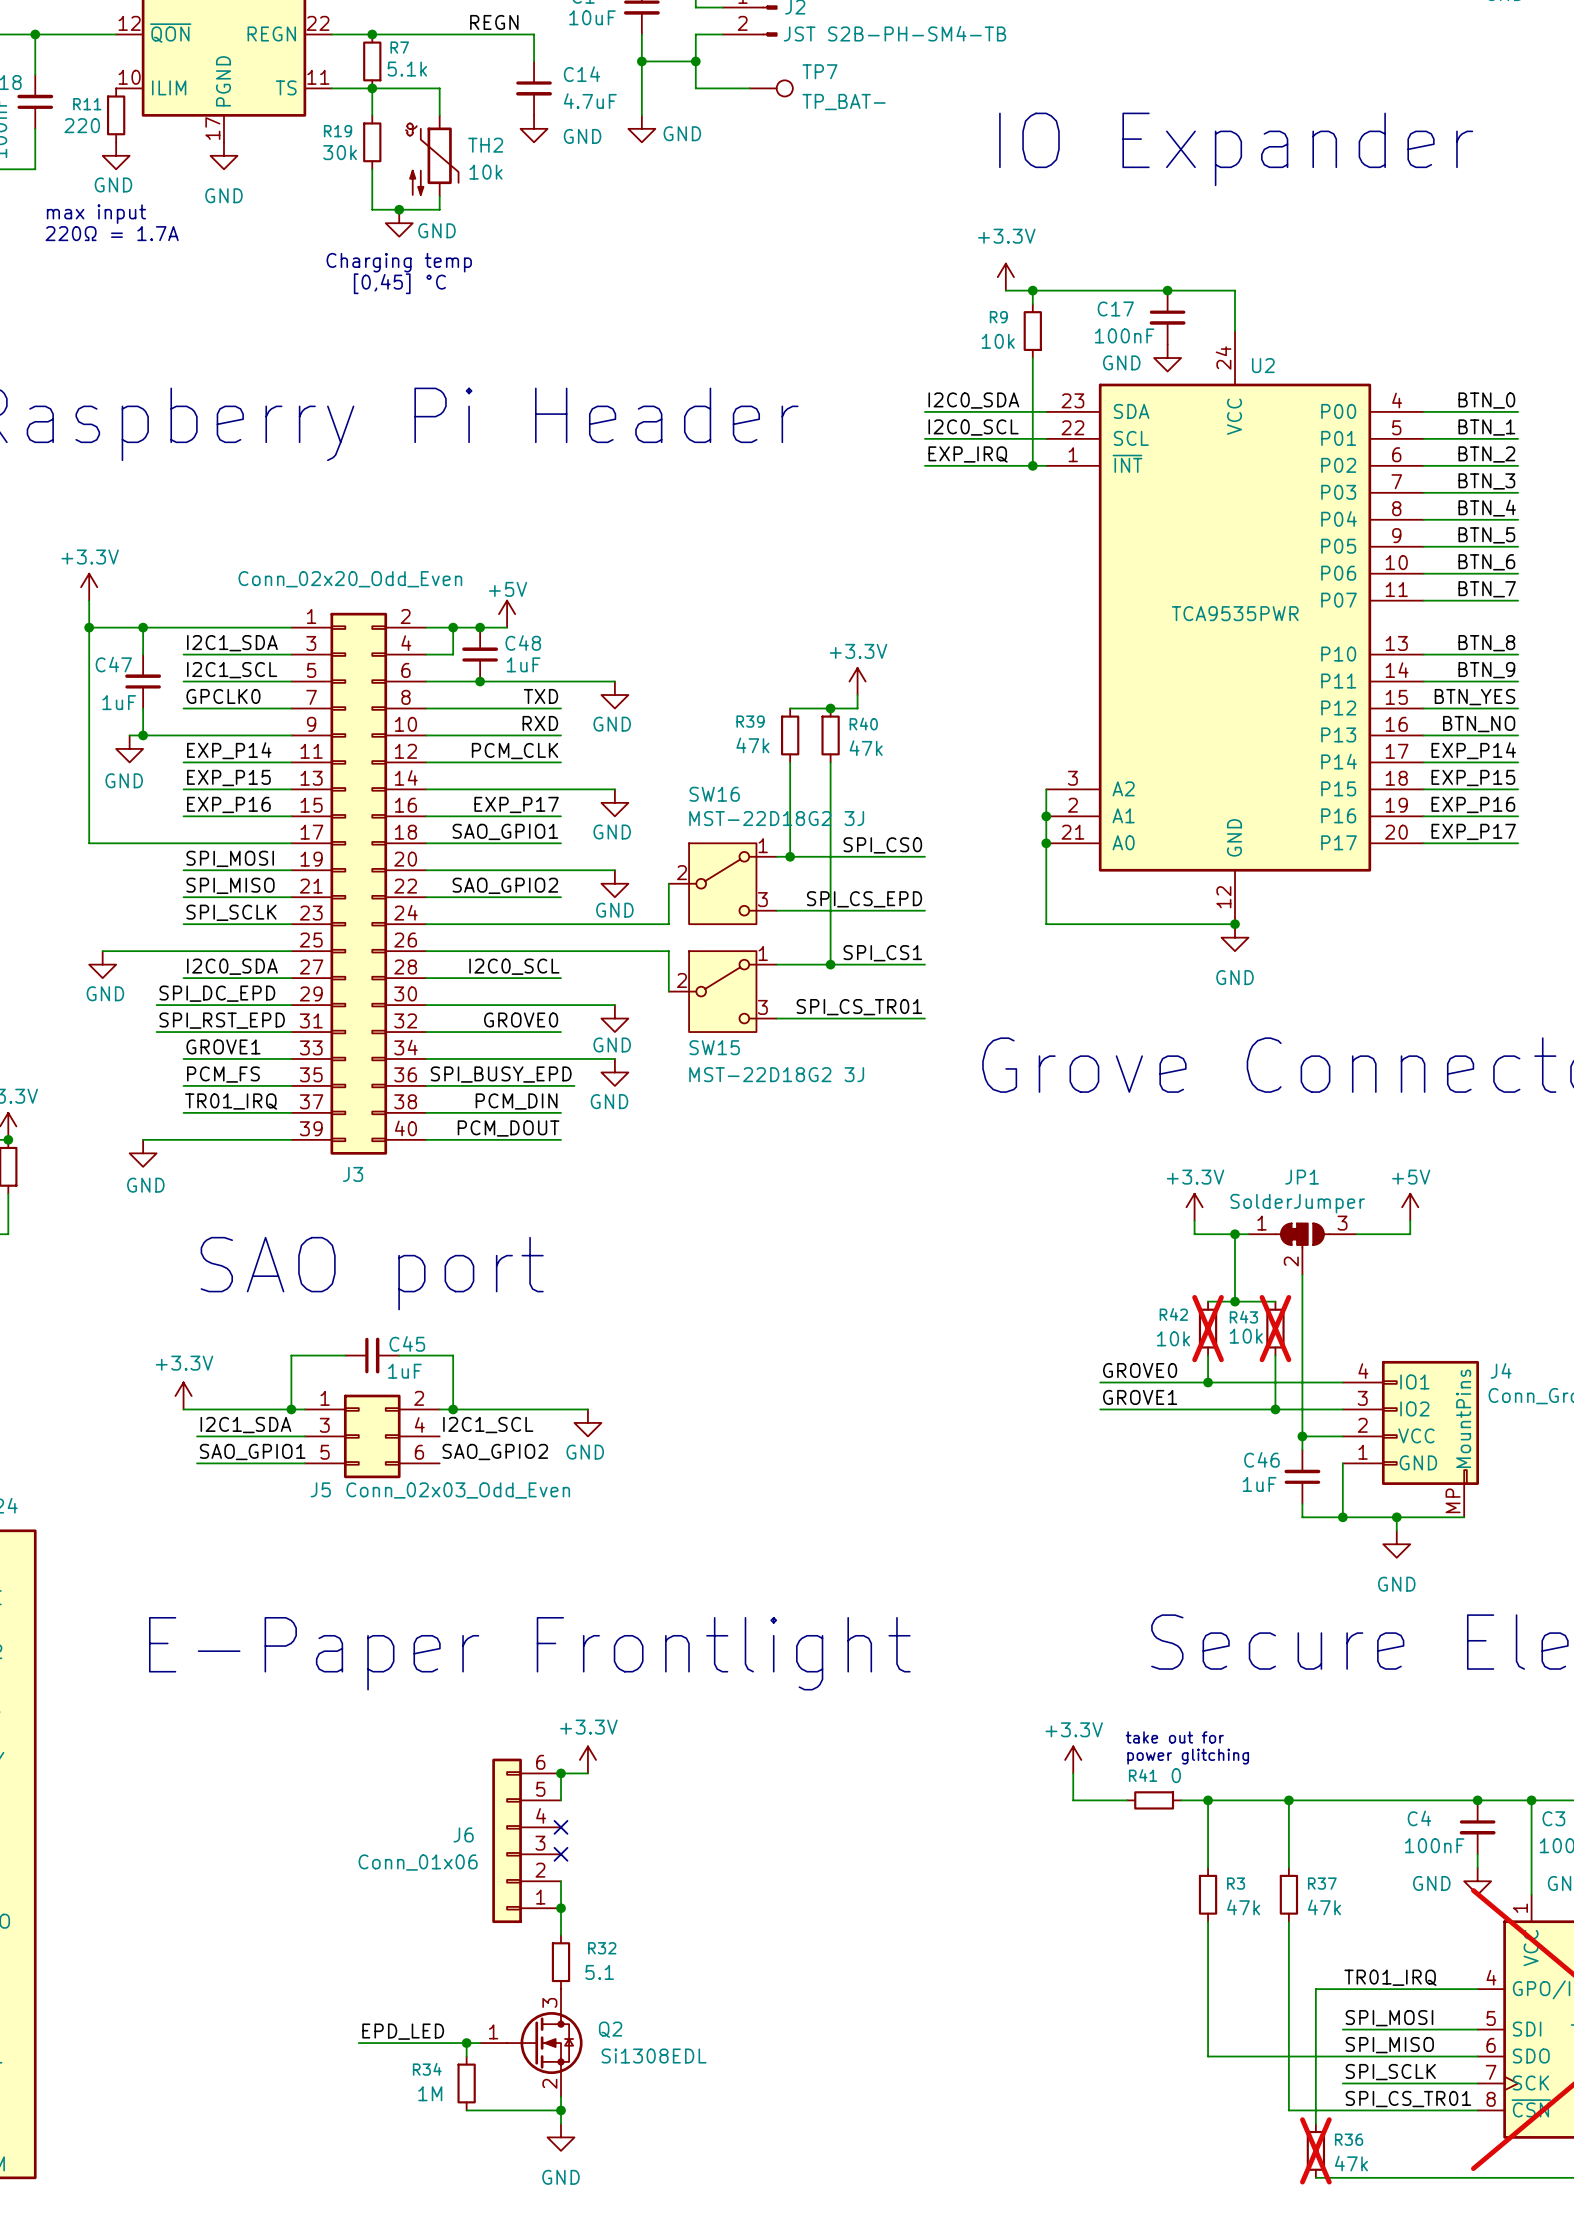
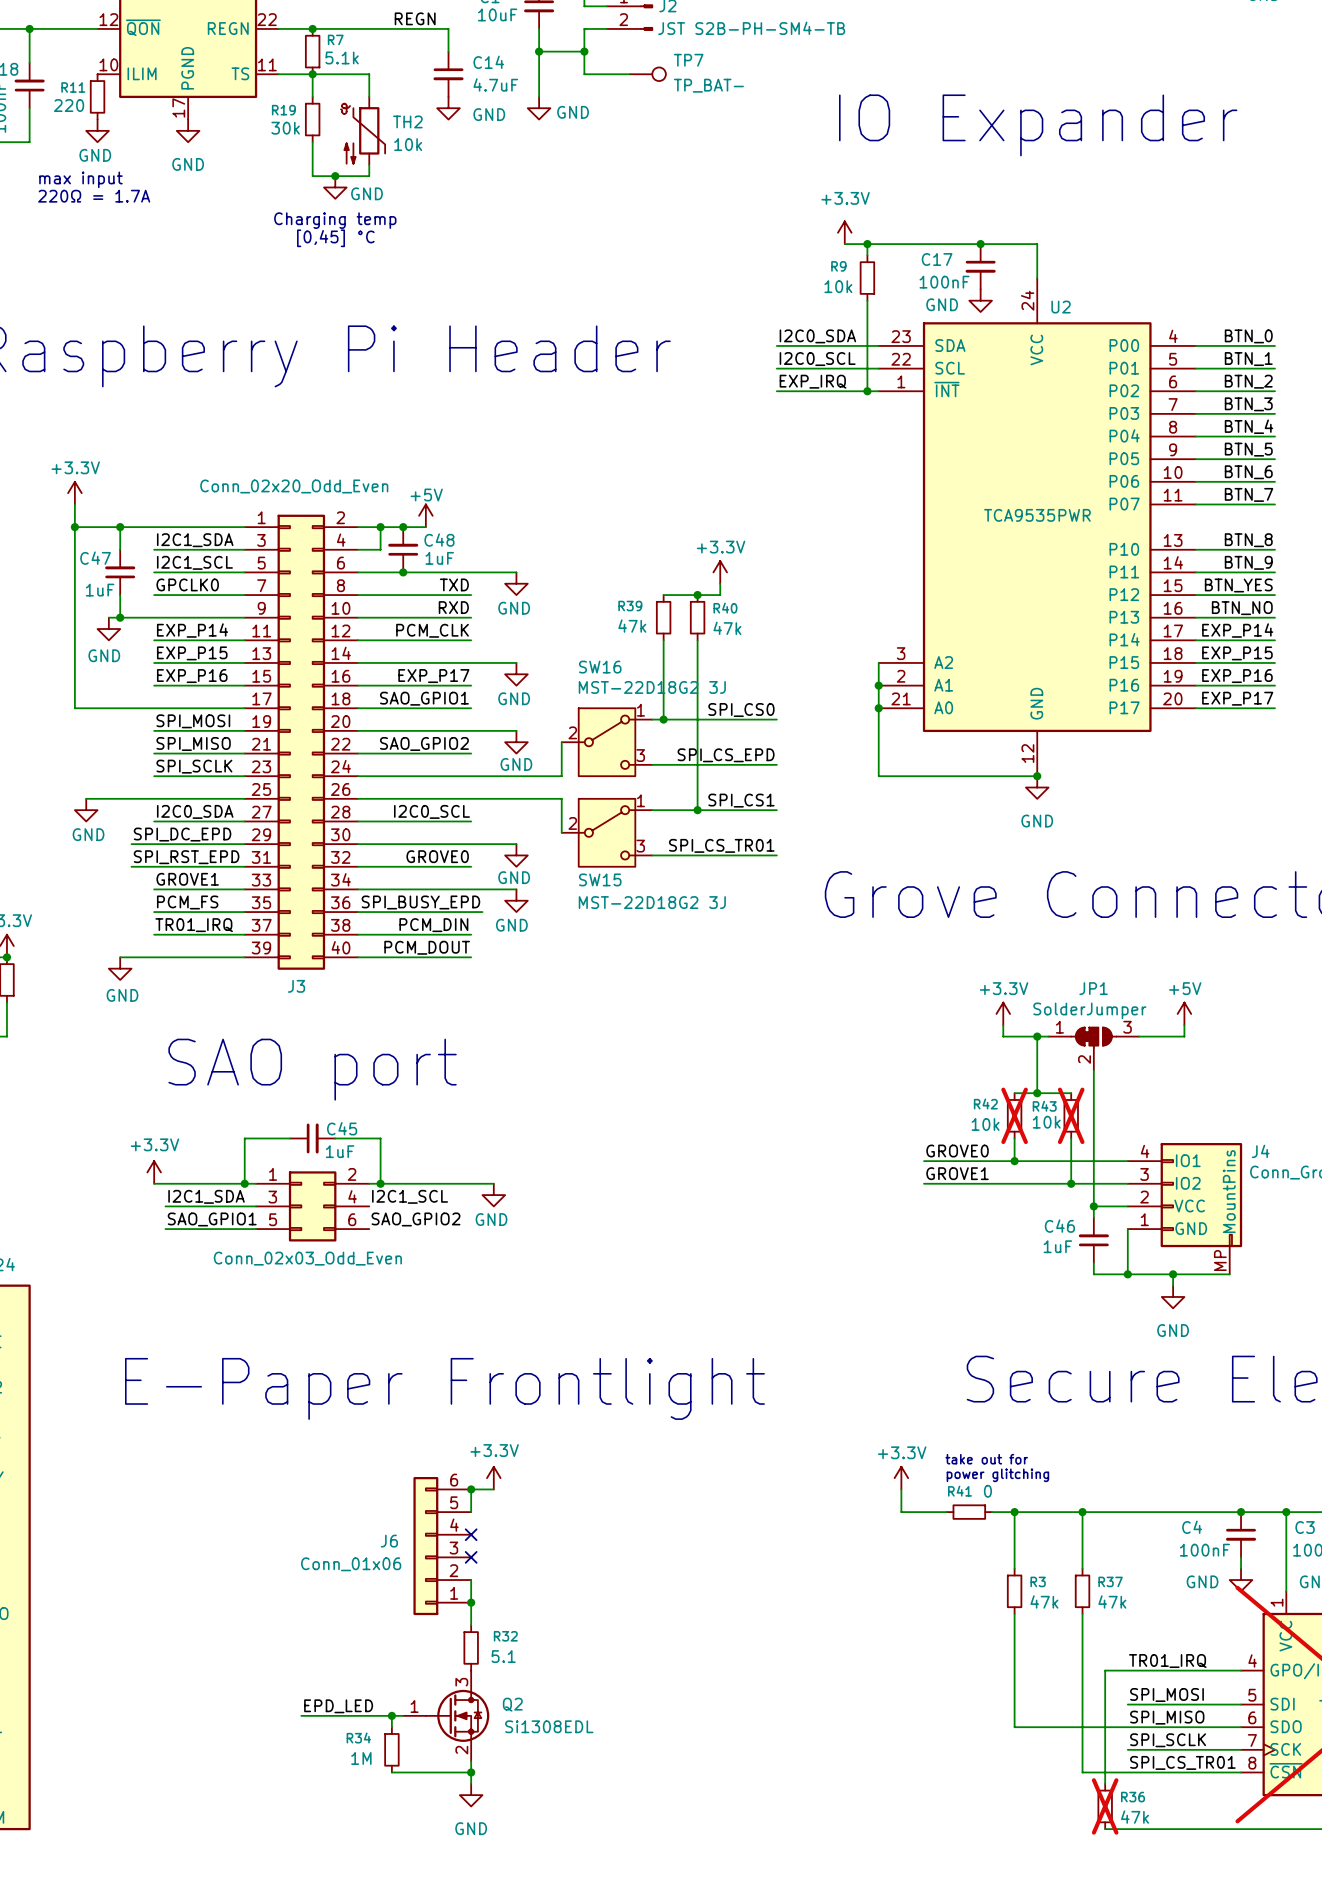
J5 name: J5 (320, 1489) -> none
J5 value position: Conn_02x03_Odd_Even (458, 1490) -> Conn_02x03_Odd_Even (307, 1258)

